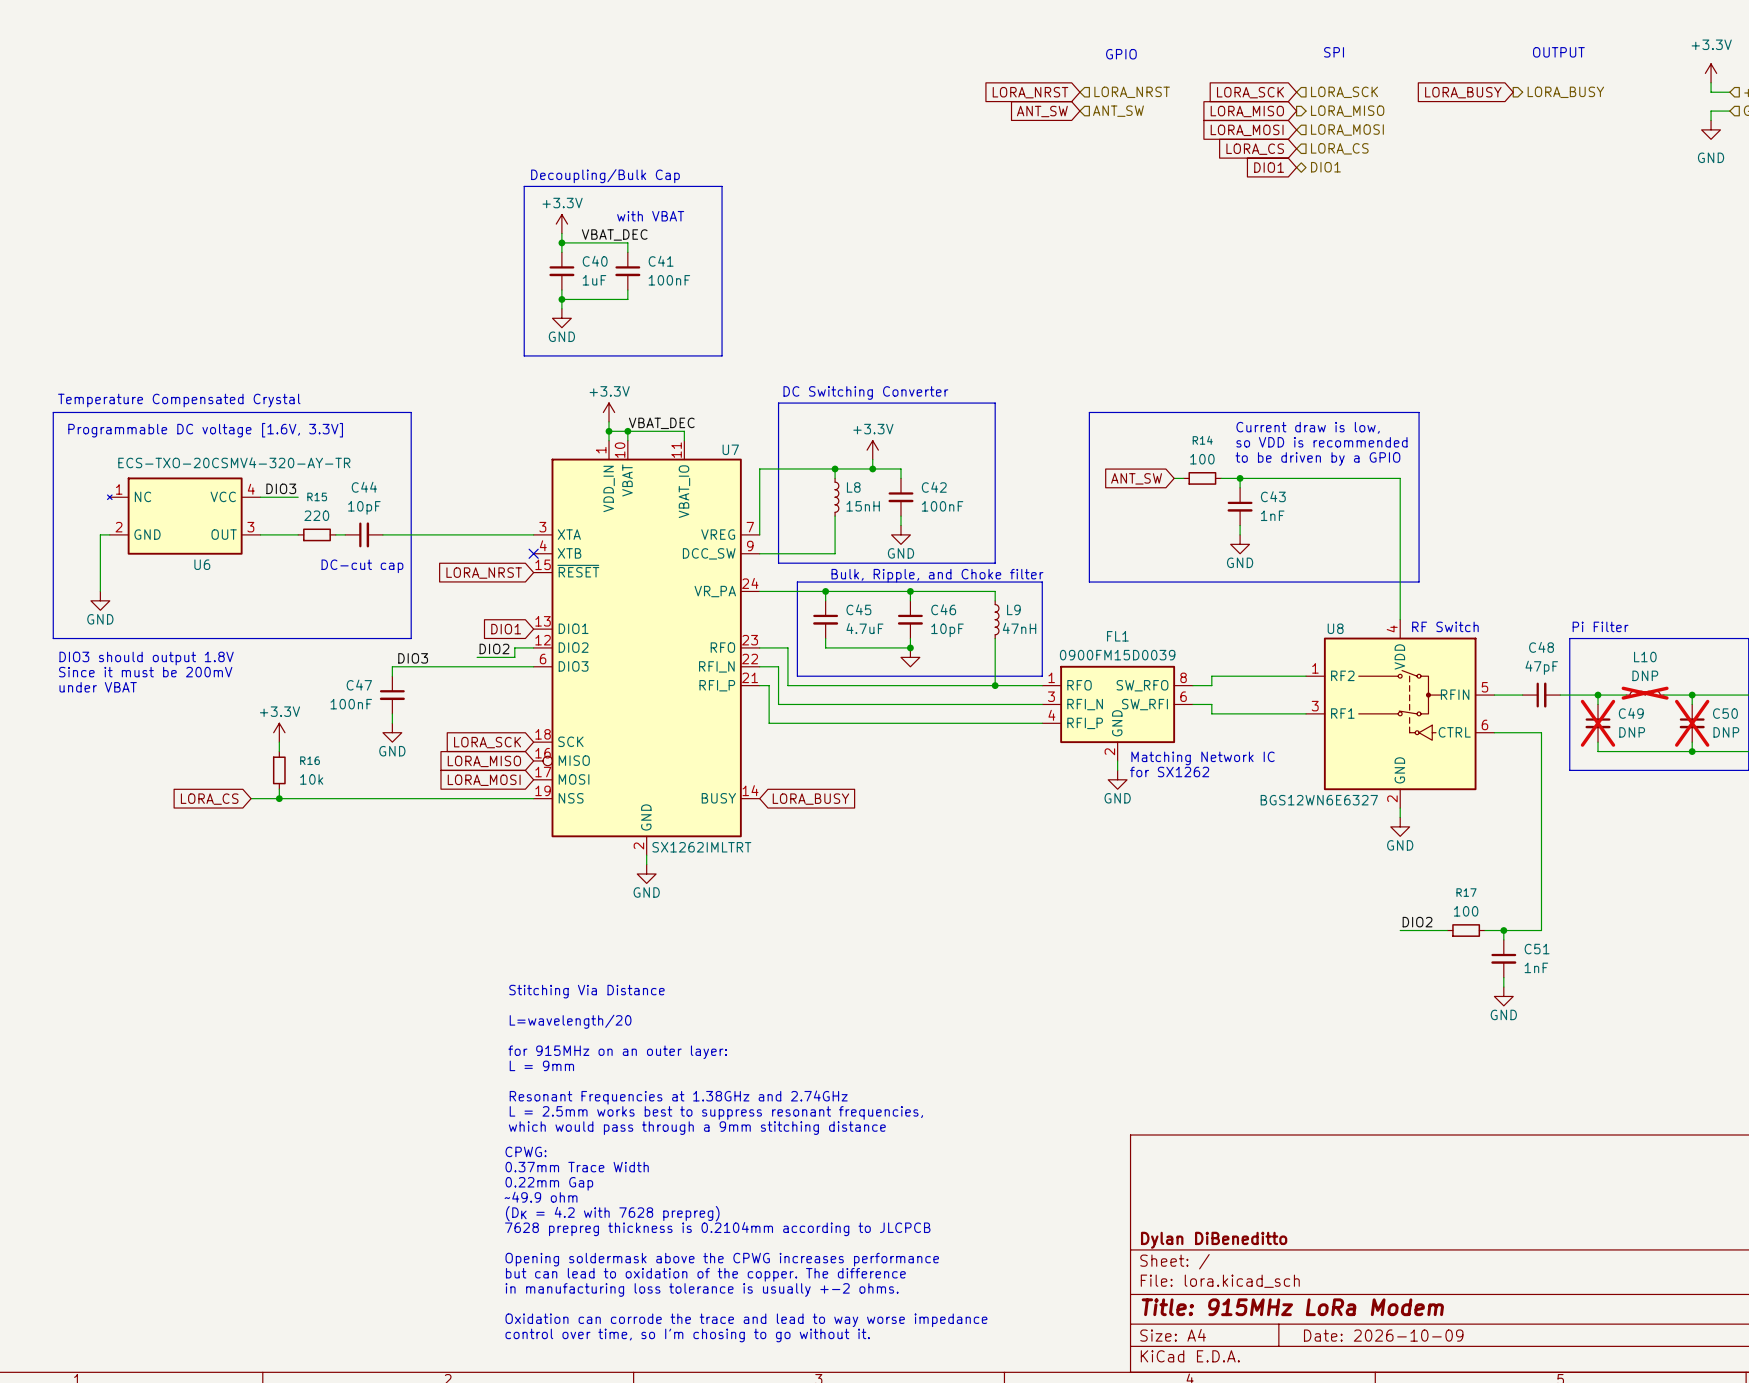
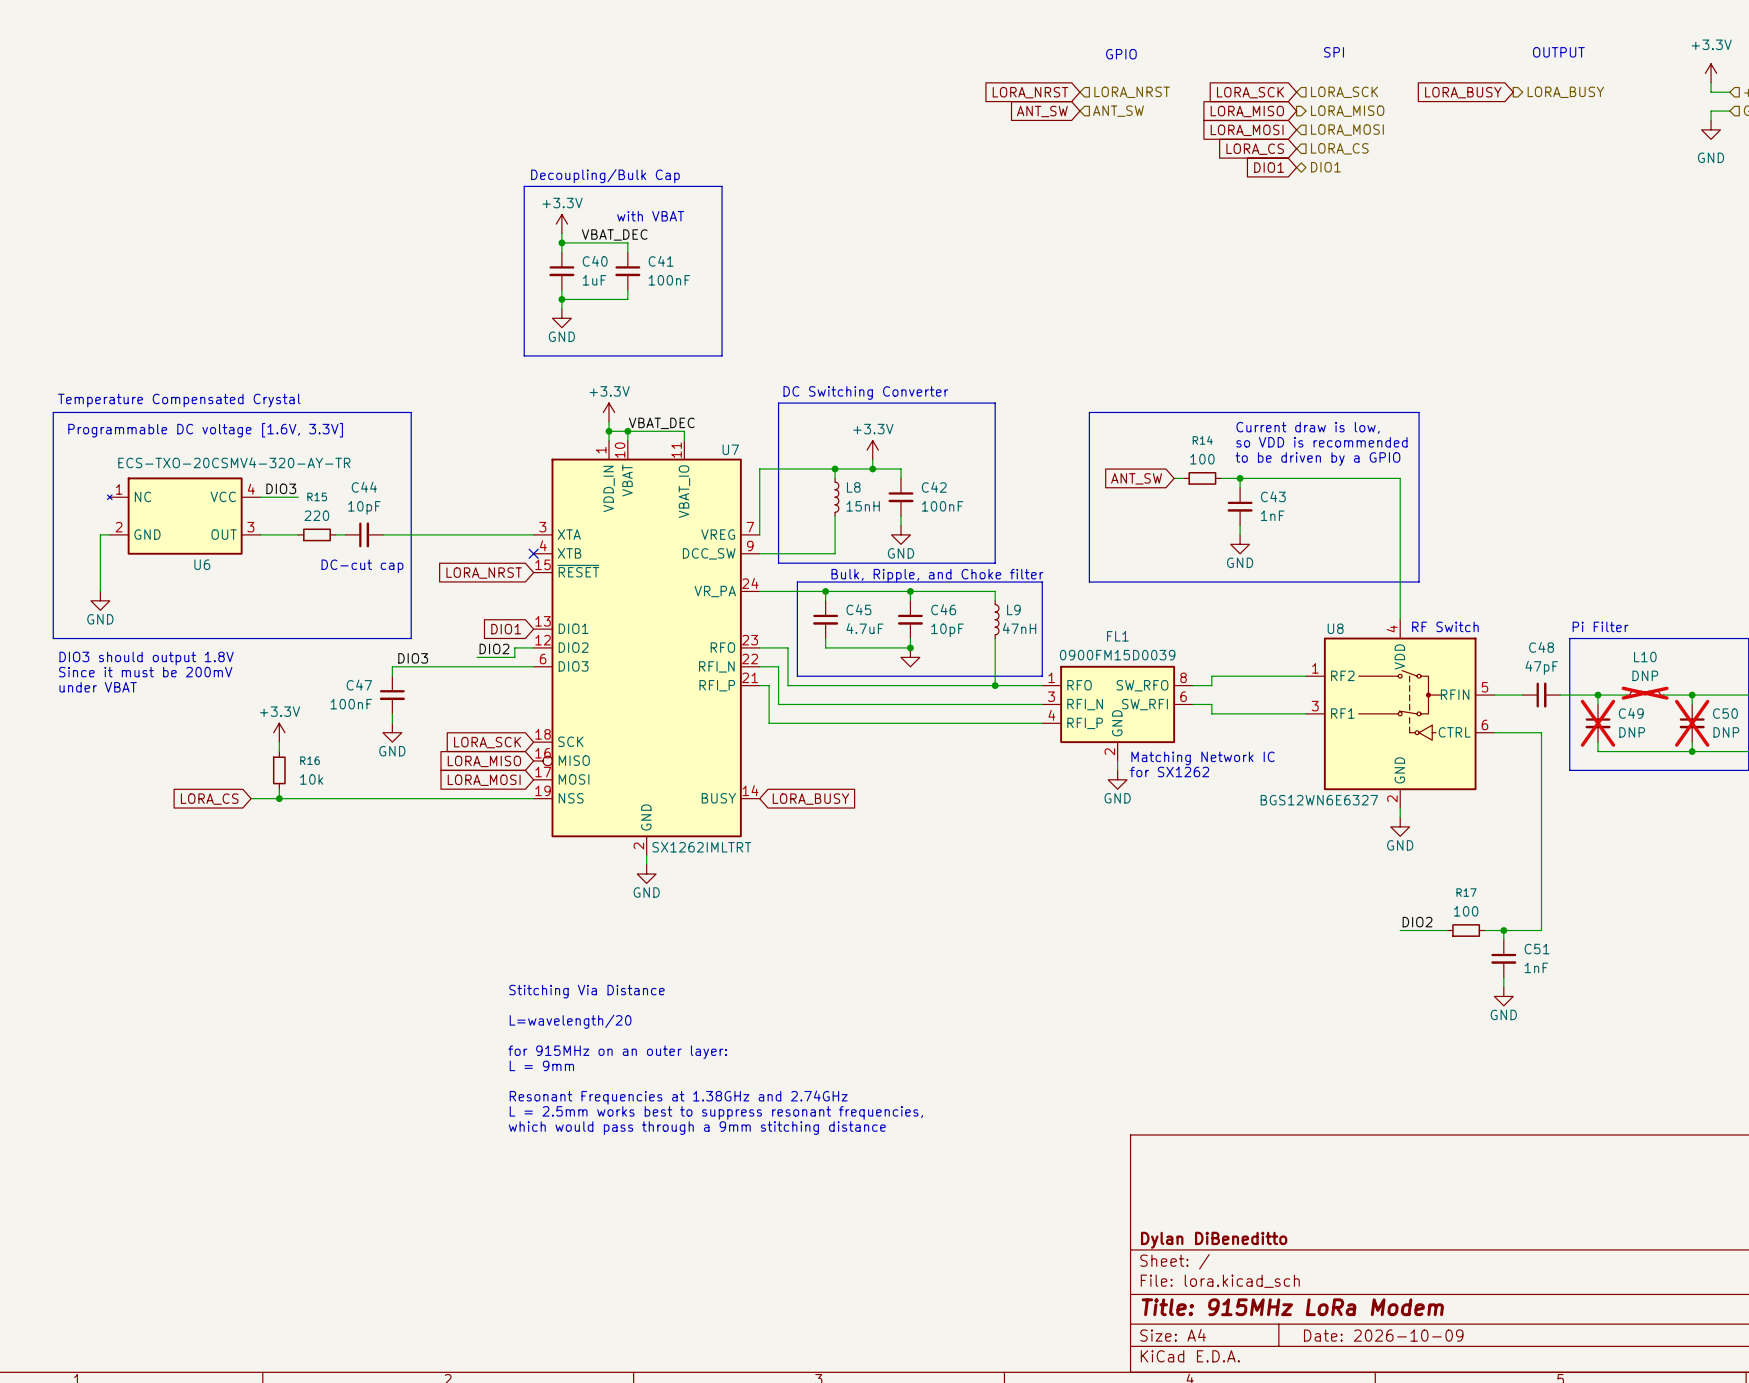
text: CPWG: (526, 1151) -> none
text: 0.37mm Trace Width (577, 1167) -> none
text: 0.22mm Gap (549, 1183) -> none
text: ~49.9 ohm (541, 1197) -> none
text: (DK = 4.2 with 7628 prepreg) (612, 1213) -> none
text: 7628 prepreg thickness is 0.2104mm according to JLCPCB (717, 1229) -> none
text: Opening soldermask above the CPWG increases performance (722, 1259) -> none
text: but can lead to oxidation of the copper. The difference (705, 1274) -> none
text: in manufacturing loss tolerance is usually +-2 ohms. (702, 1289) -> none
text: Oxidation can corrode the trace and lead to way worse impedance (746, 1320) -> none
text: control over time, so I'm chosing to go without it. (687, 1335) -> none

